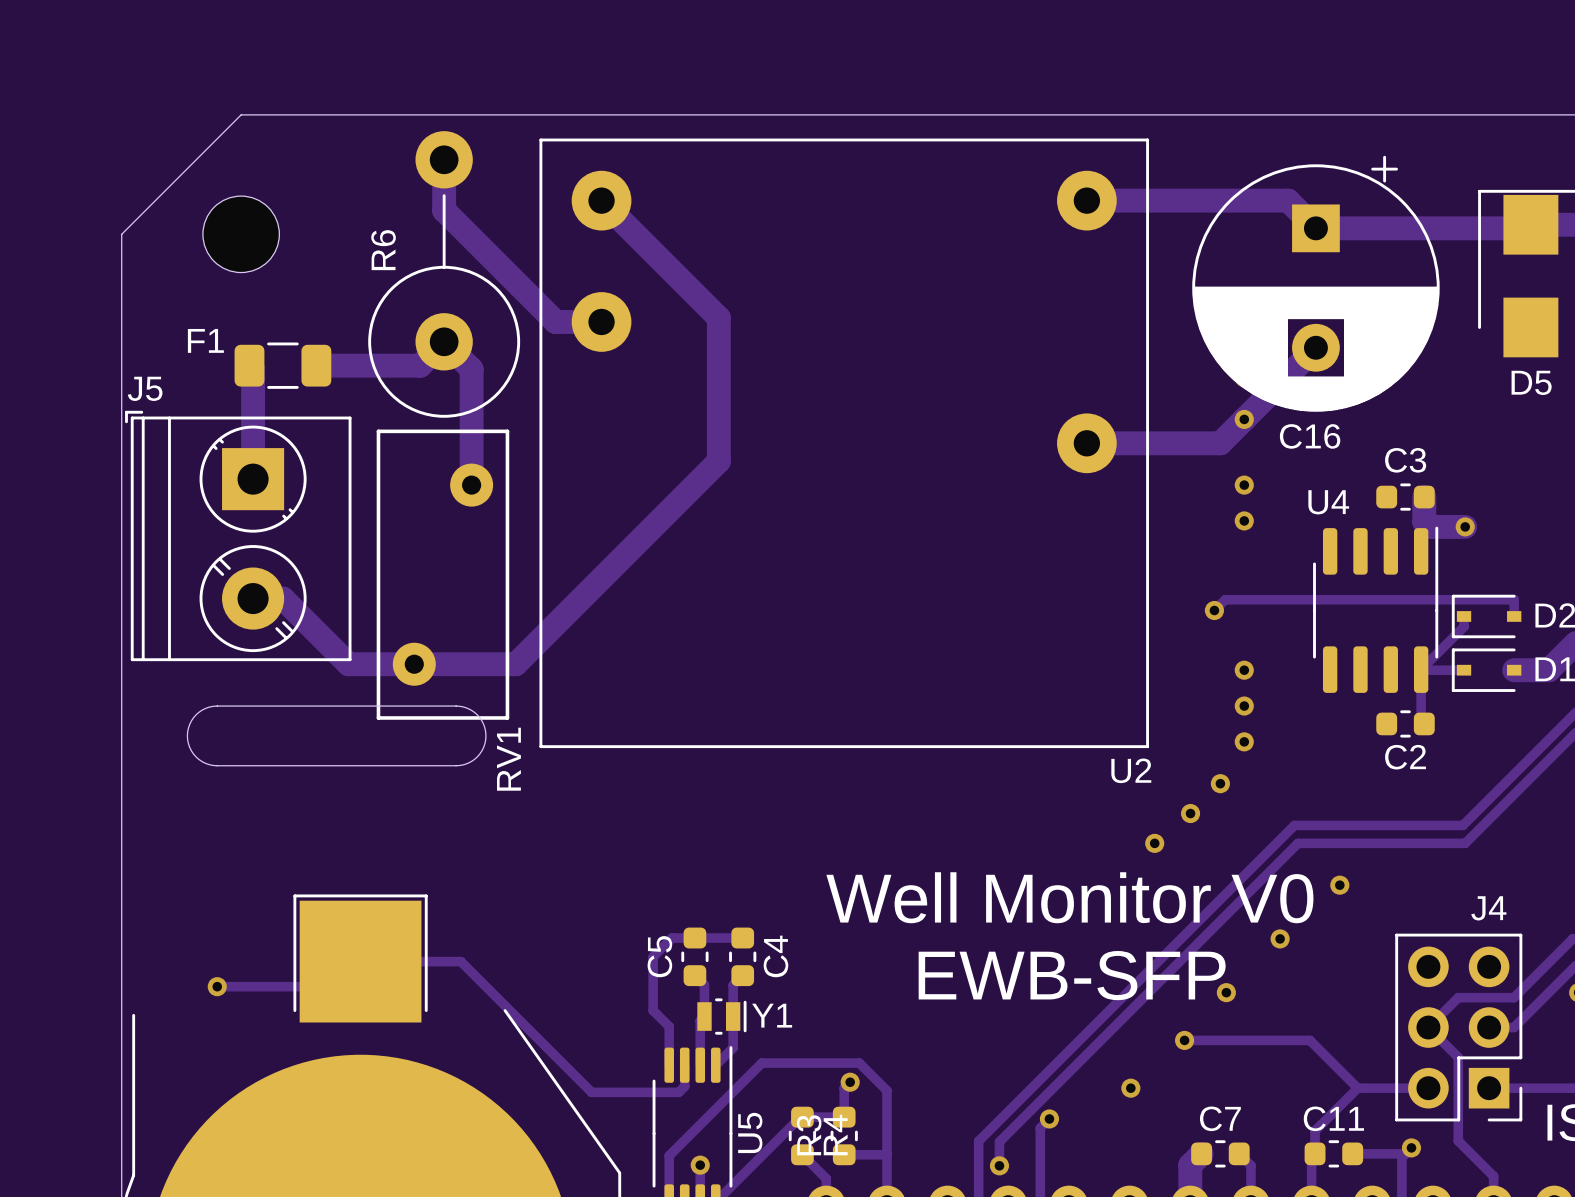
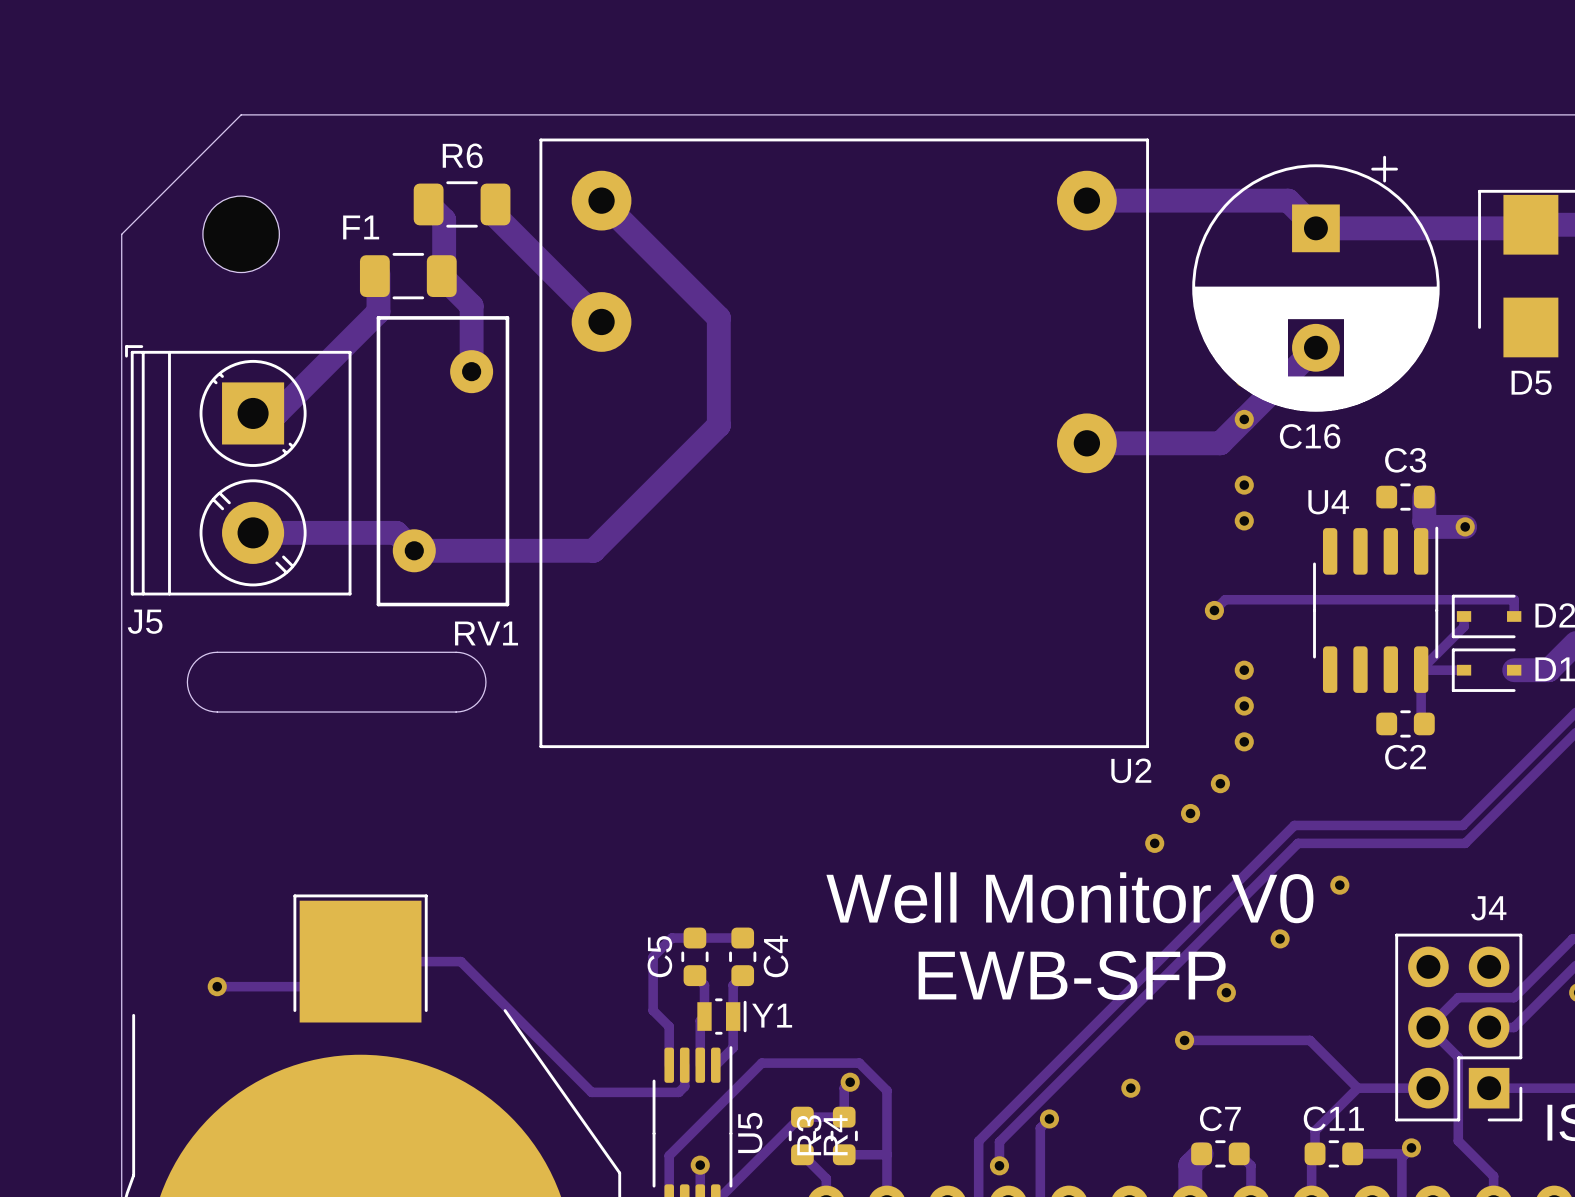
R6 footprint: [368, 131, 521, 418] -> [413, 181, 511, 228]
track: (444, 159) (444, 210) (555, 321) (601, 321) -> (495, 204) (495, 215) (601, 321)
R6 name position: R6 (383, 250) -> R6 (462, 155)
track: none -> (378, 273) (378, 311) (276, 413) (253, 413)
F1 name position: F1 (205, 340) -> F1 (361, 227)
track: (249, 365) (253, 369) (253, 479) -> none
F1 position: (282, 365) -> (408, 276)
track: (316, 365) (420, 365) (444, 341) (471, 369) -> (428, 204) (444, 219) (444, 278) (471, 305) (471, 369)
track: (471, 371) (471, 485) -> none
J5 name position: J5 (145, 388) -> J5 (145, 621)
track: (718, 425) (718, 461) (515, 664) (348, 664) (282, 598) (253, 598) -> (718, 425) (593, 550) (414, 550) (396, 532) (253, 532)
J5 position: (238, 535) -> (238, 470)
RV1 position: (442, 574) -> (442, 461)
board edge: (217, 706) (459, 706) (471, 710) (479, 717) (484, 728) (485, 739) (481, 750) (477, 757) (471, 761) (459, 765) (213, 765) (202, 761) (193, 754) (188, 743) (187, 731) (191, 720) (196, 714) (205, 708) (217, 706) -> (217, 652) (459, 652) (471, 656) (479, 663) (484, 674) (485, 686) (481, 697) (477, 703) (471, 708) (459, 711) (213, 711) (202, 708) (193, 700) (188, 689) (187, 678) (191, 667) (196, 661) (205, 654) (217, 652)
RV1 name rotation: 0° (508, 759) -> 90° clockwise (486, 633)

